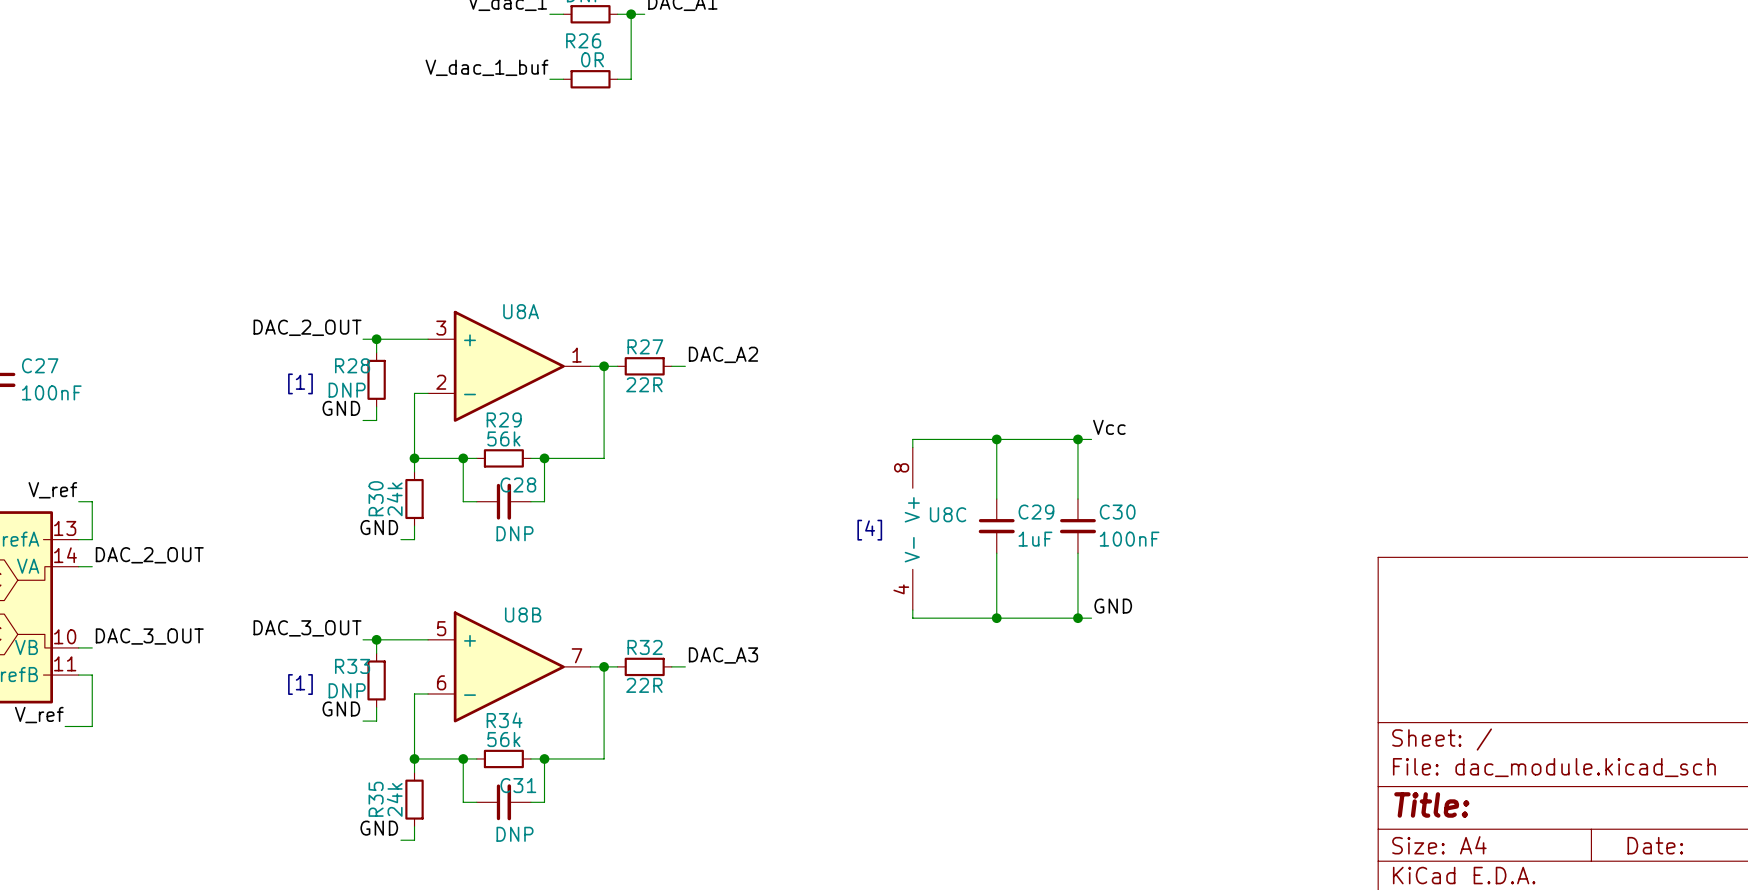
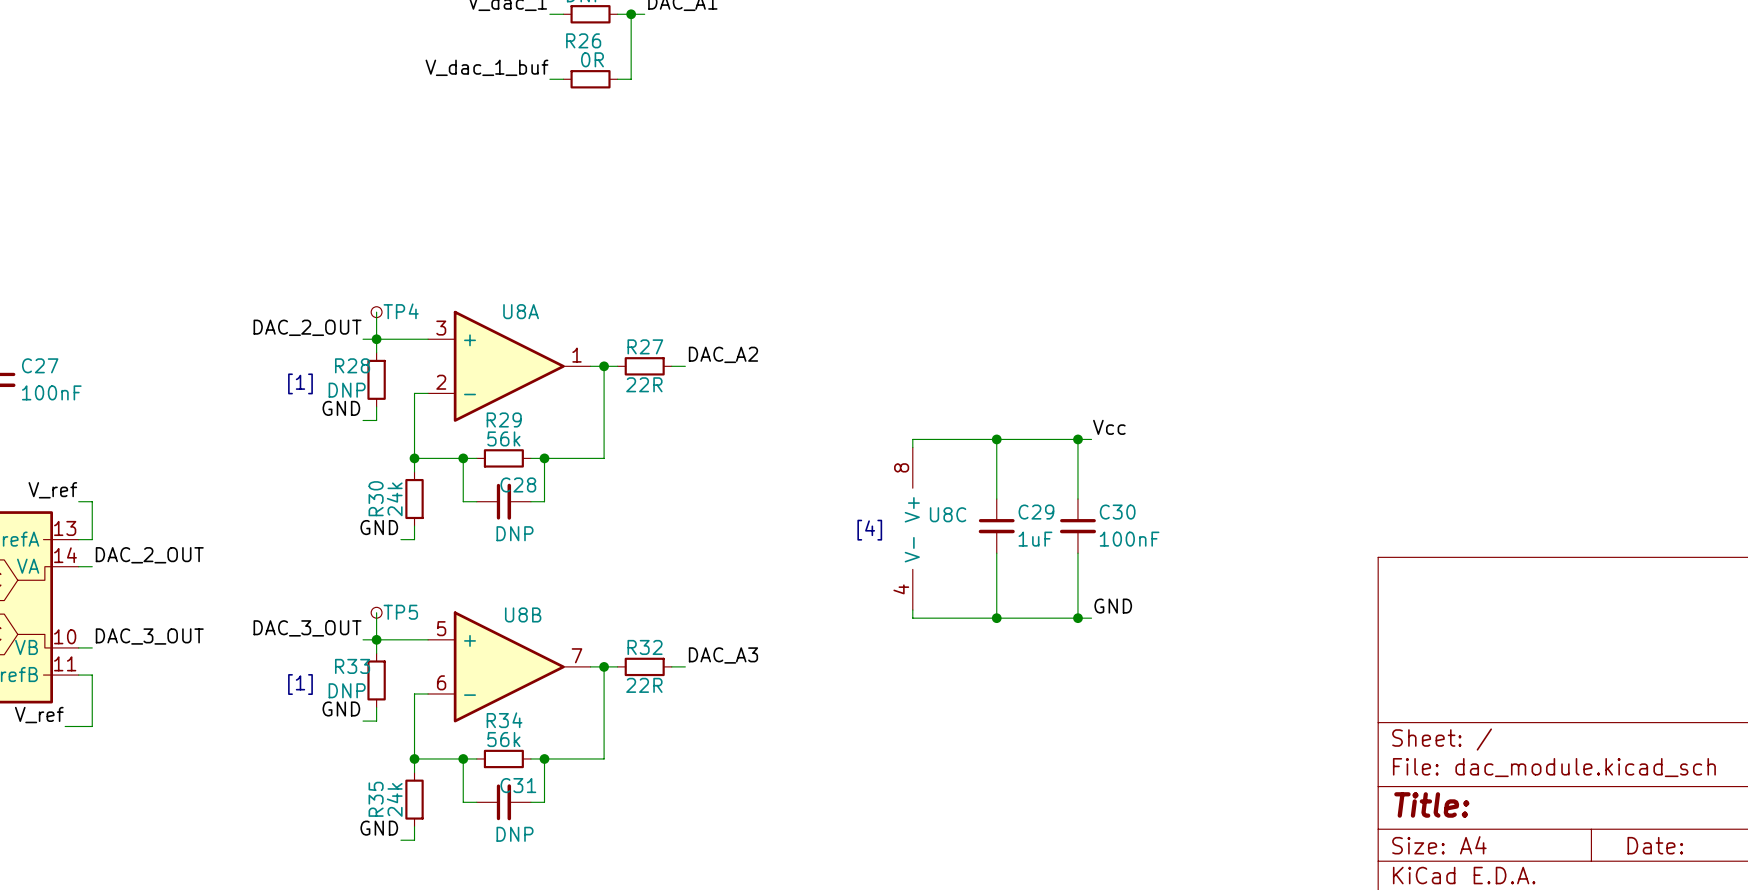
wire: none -> (376, 312) (376, 339)
TP4: none -> (376, 312)
wire: none -> (376, 612) (376, 639)
TP5: none -> (376, 612)

